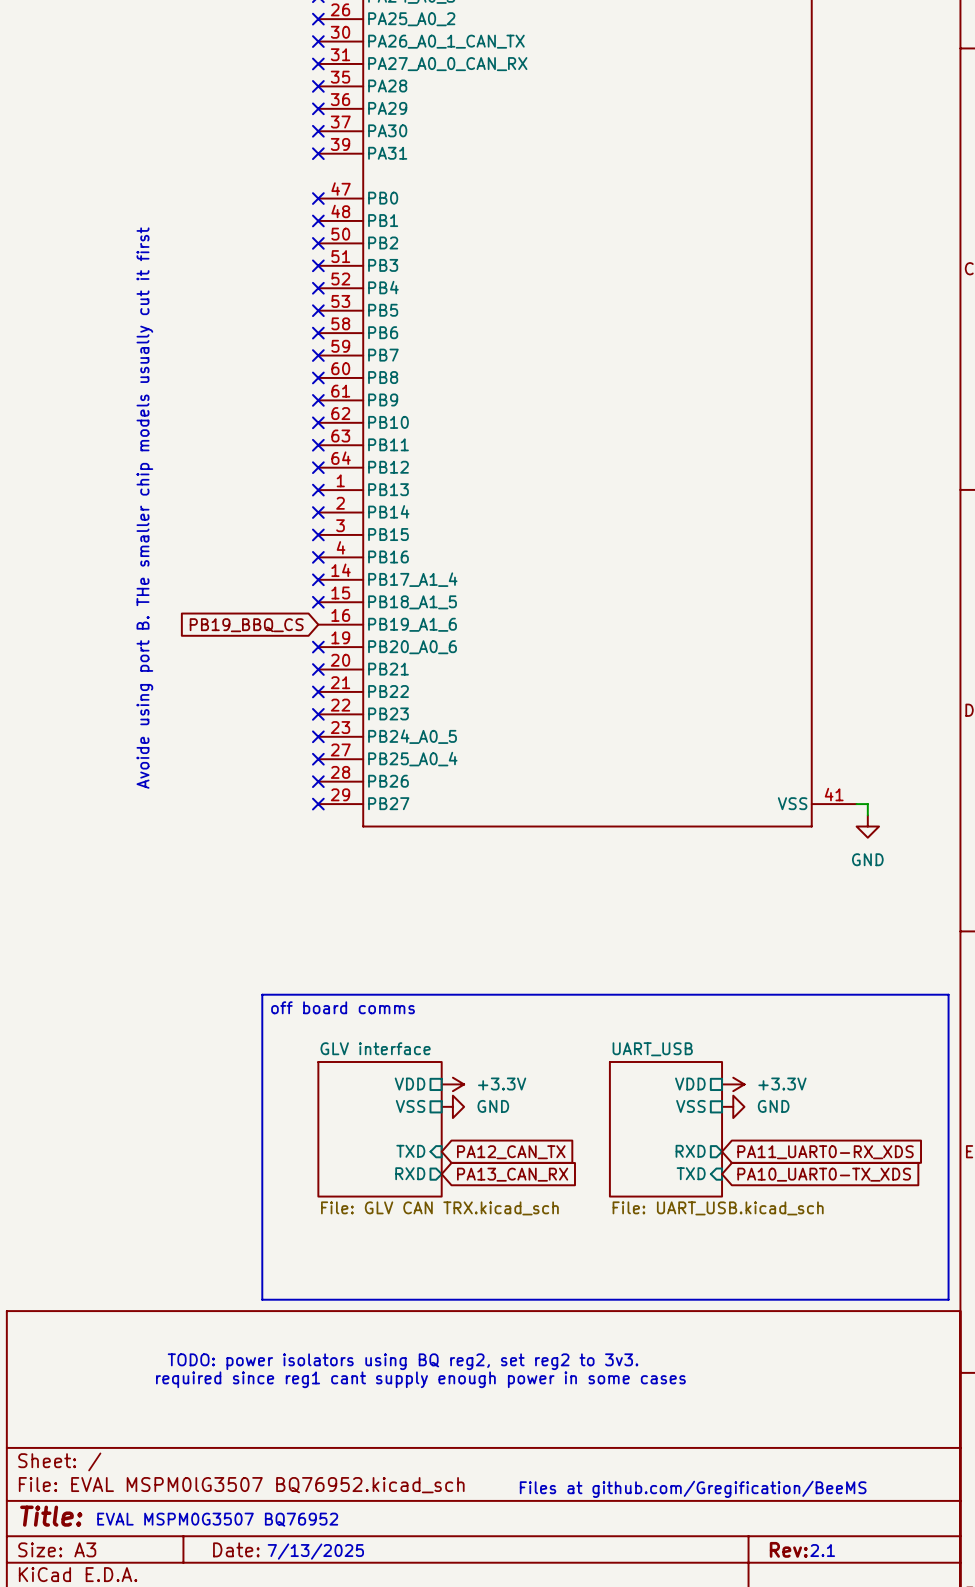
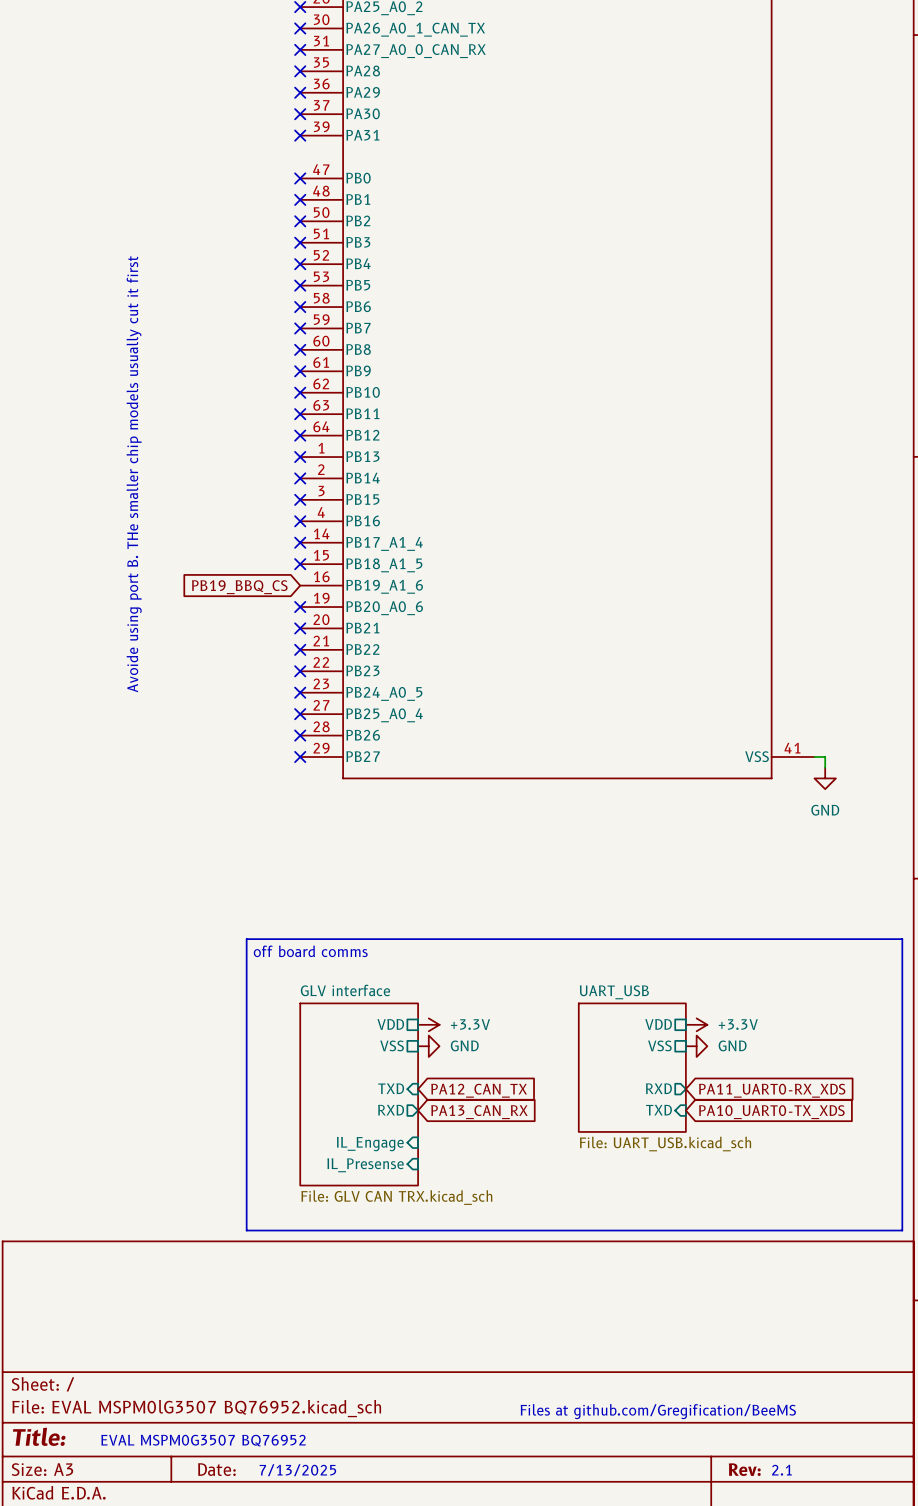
sheet GLV interface: File: GLV CAN TRX.kicad_sch (380, 1129) -> none
sheet GLV interface: none -> File: GLV CAN TRX.kicad_sch (359, 1094)
sheet pin: none -> IL_Engage (370, 1144)
sheet pin: none -> IL_Presense (365, 1165)
text: TODO: power isolators using BQ reg2, set reg2 to 3v3. (403, 1361) -> none
text: required since reg1 cant supply enough power in some cases (420, 1379) -> none

